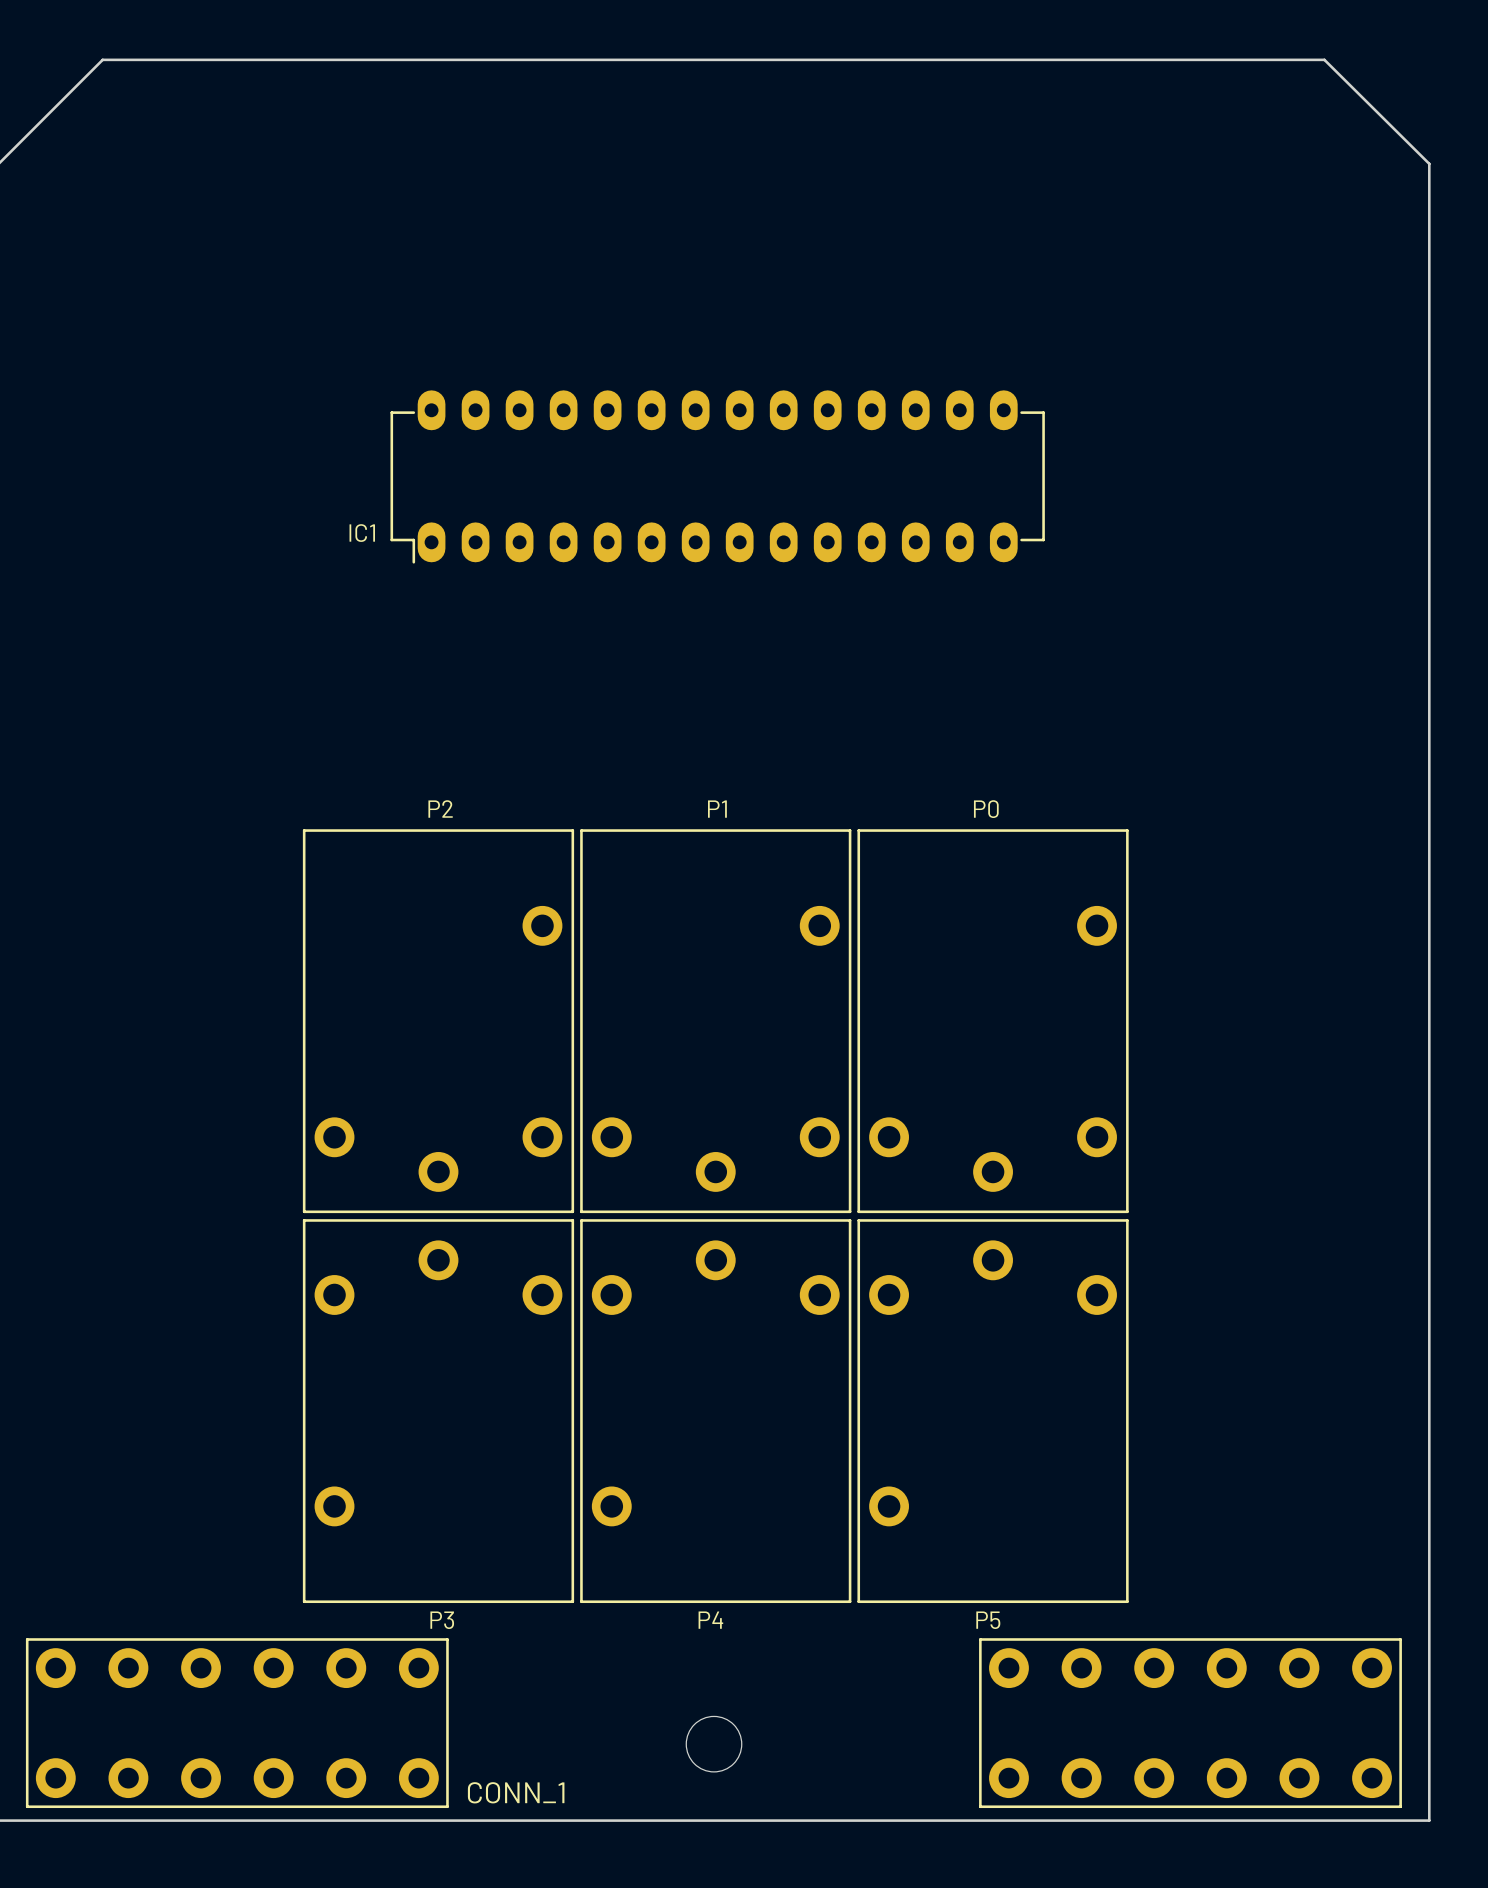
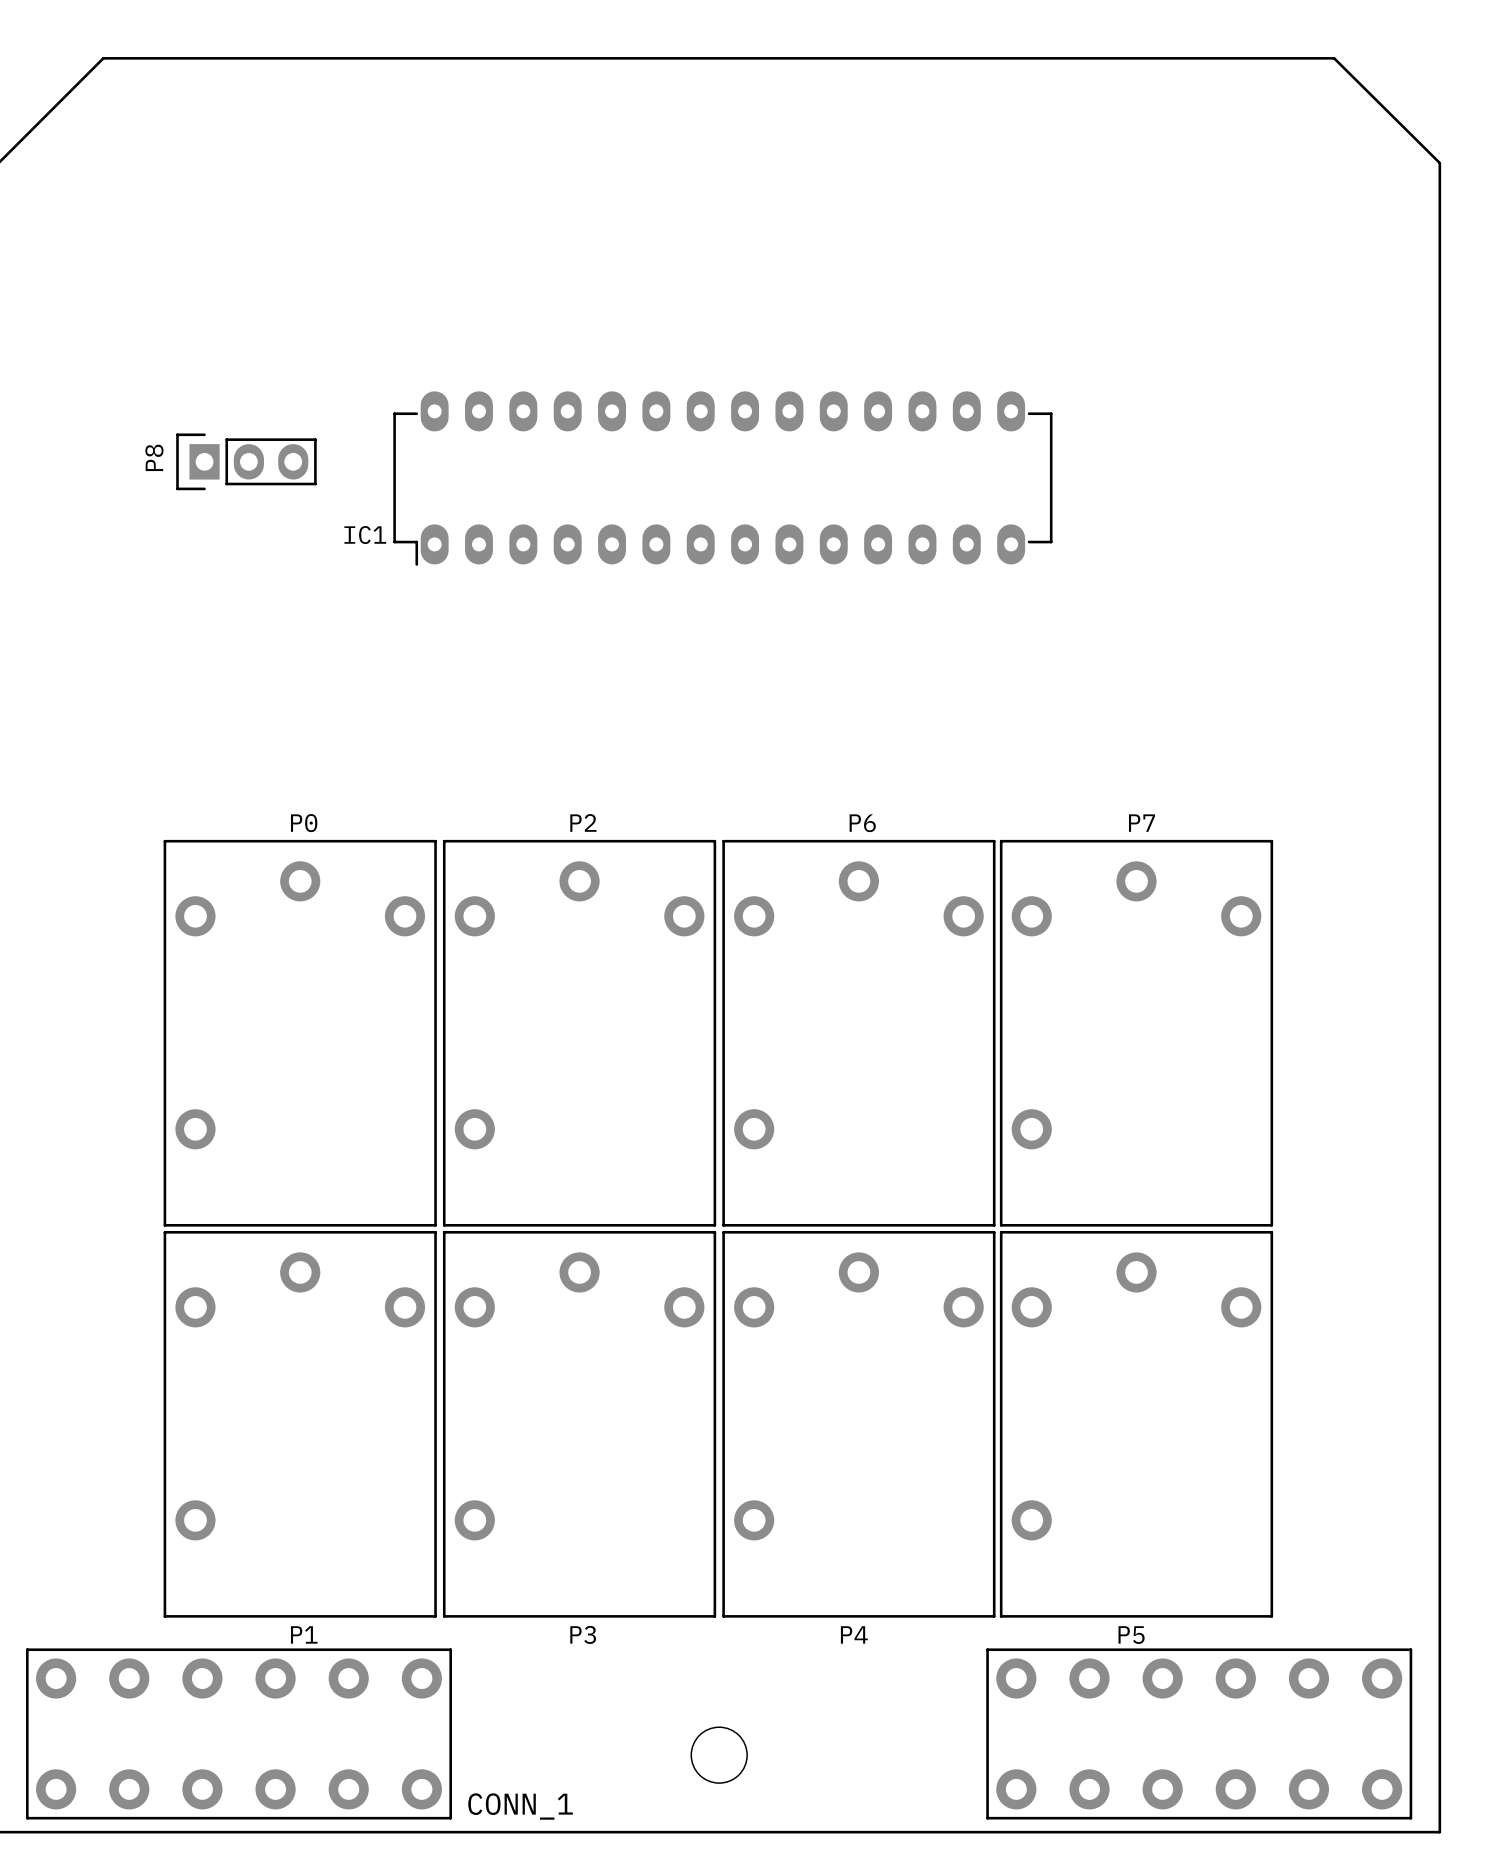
P8: none -> (246, 461)
P2 rotation: 0° (438, 1021) -> 180° (579, 1033)
P1 rotation: 0° (715, 1021) -> 180° (300, 1424)
P1 position: (715, 1021) -> (300, 1424)
P0 rotation: 0° (993, 1021) -> 180° (300, 1033)
P0 position: (993, 1021) -> (300, 1033)
P6: none -> (858, 1033)
P7: none -> (1136, 1033)
P3 position: (438, 1411) -> (579, 1424)
P4 position: (715, 1411) -> (858, 1424)
P5 position: (993, 1411) -> (1136, 1424)

